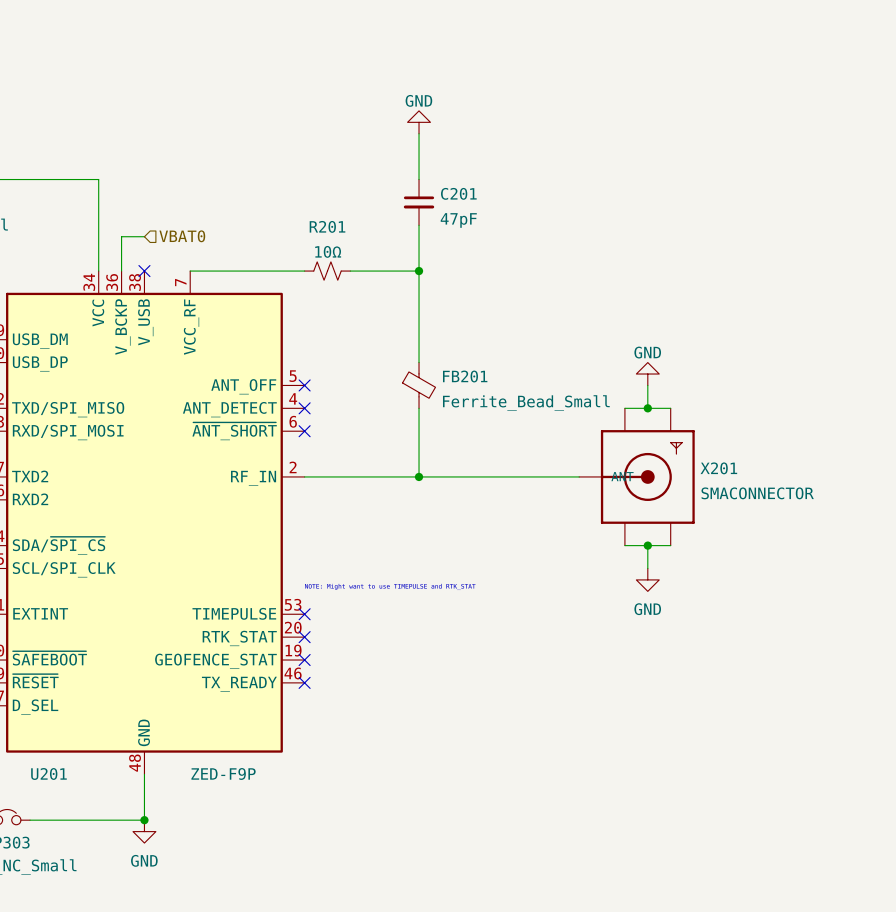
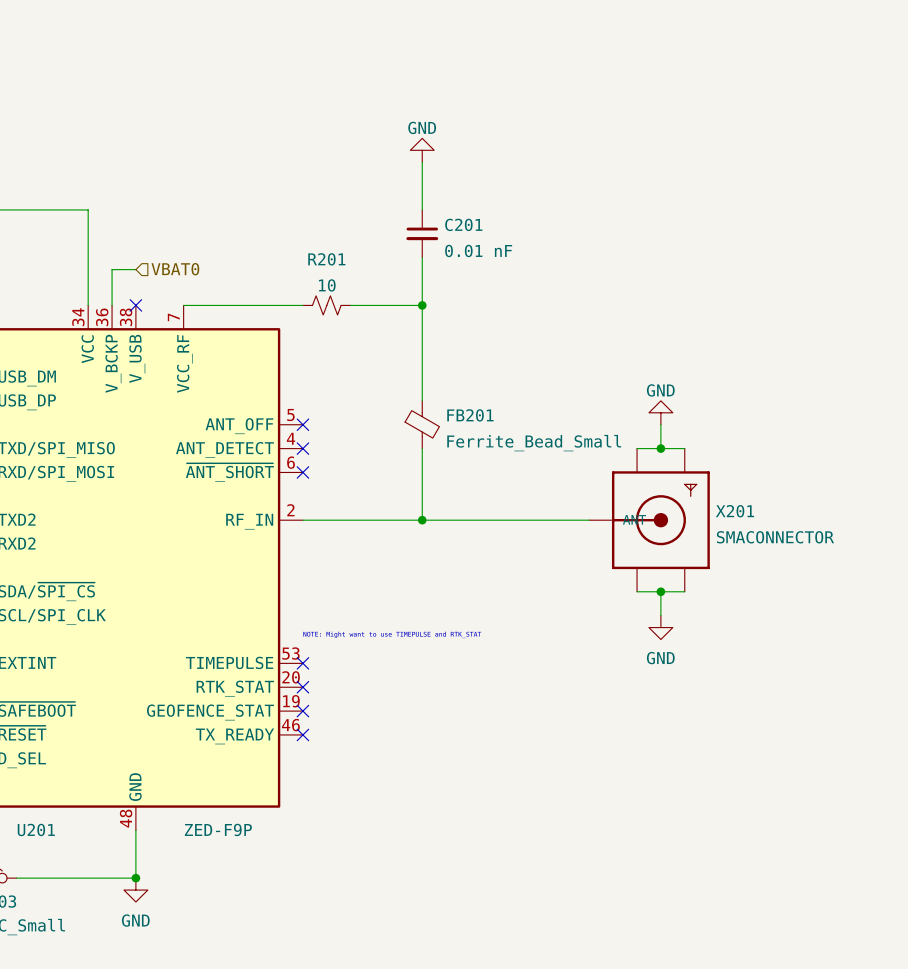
C201 value: 47pF (458, 220) -> 0.01 nF (478, 250)
R201 value: 10Ω (328, 251) -> 10 (327, 285)

